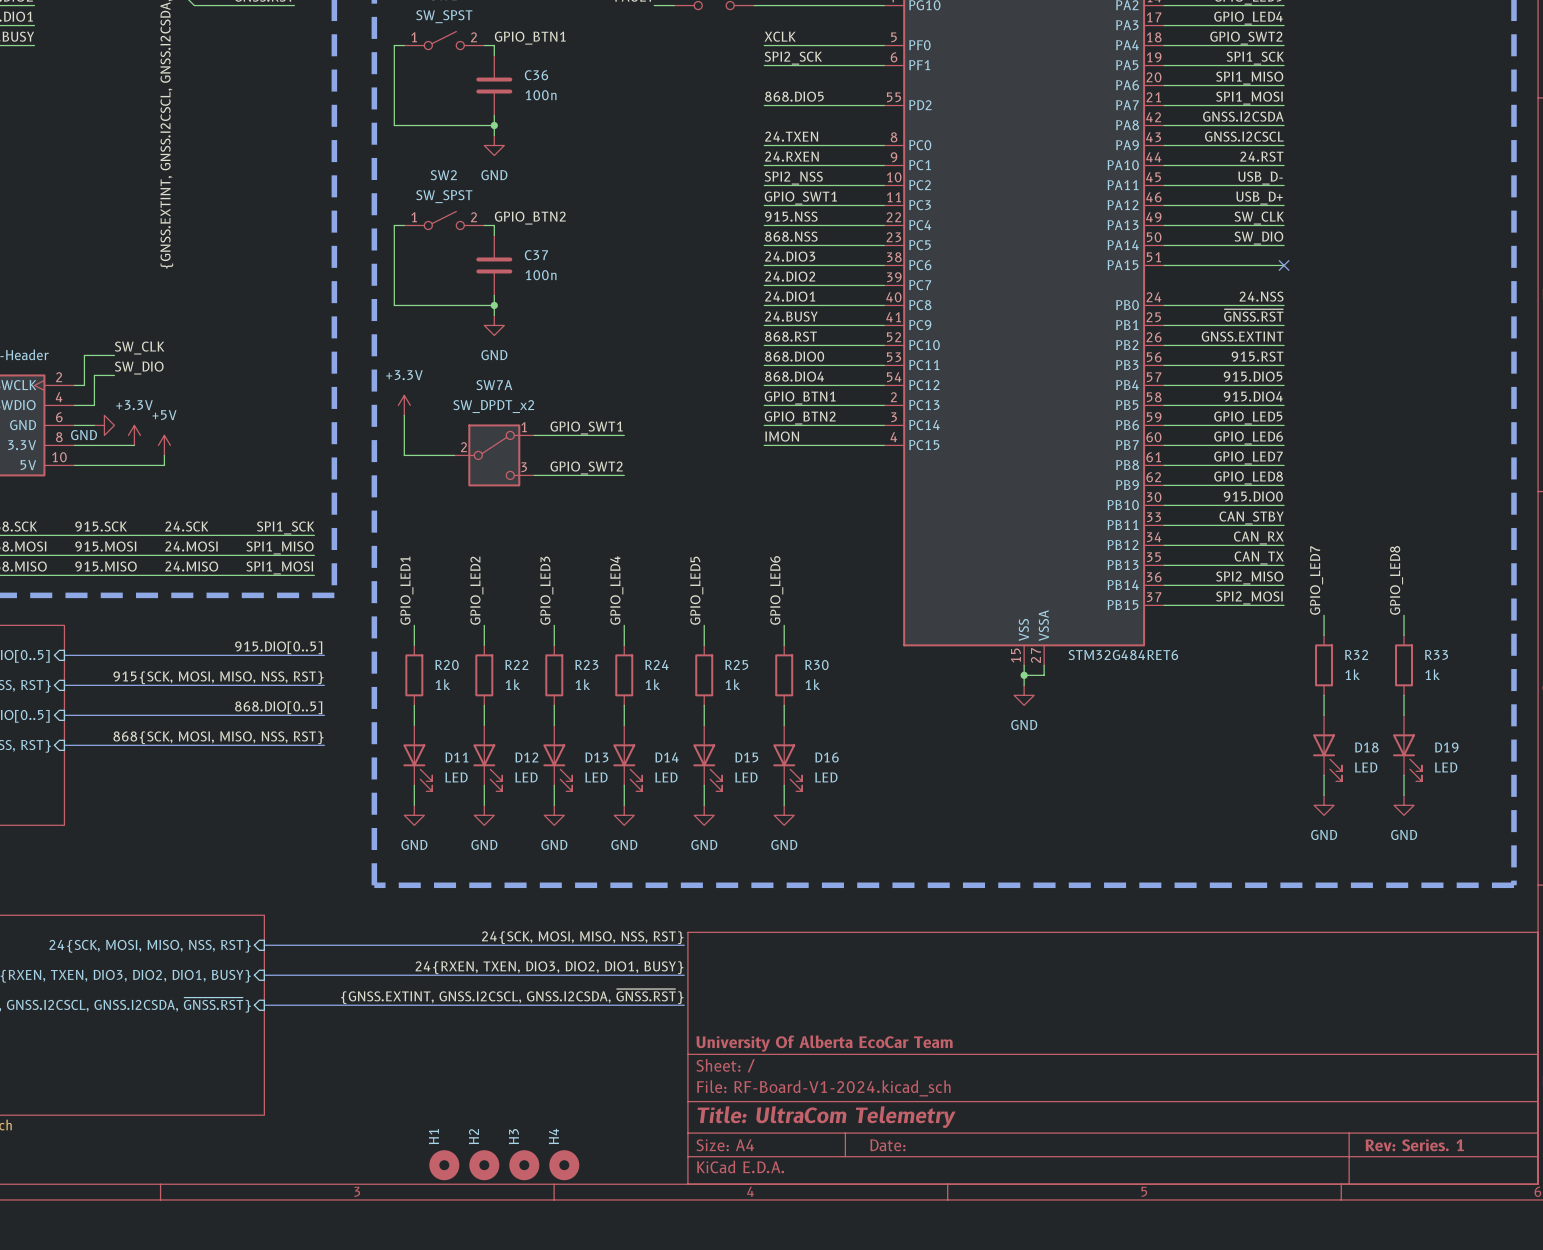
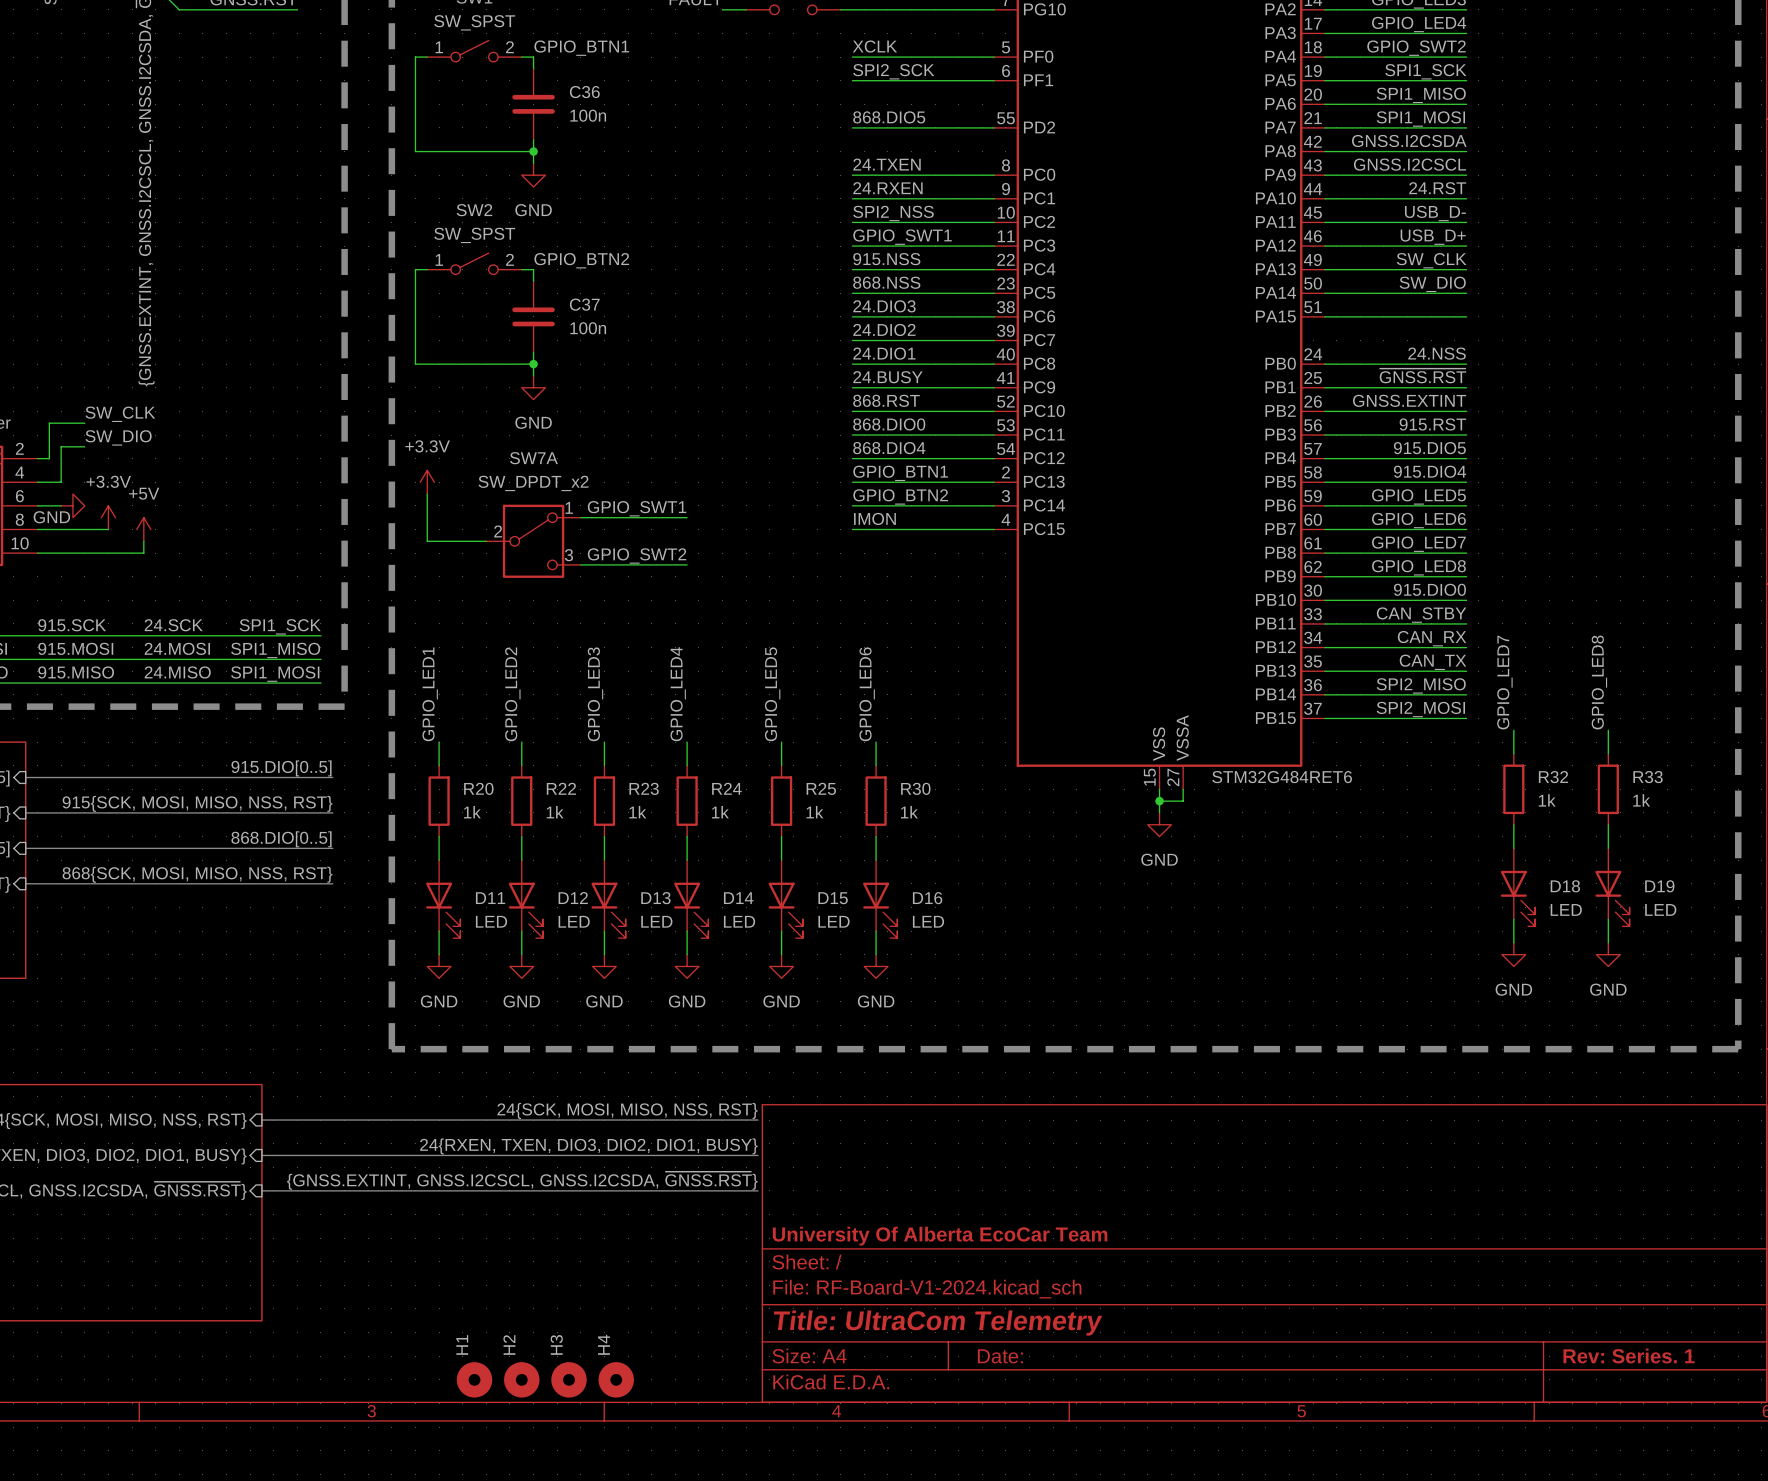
no-connect mark: (1284, 265) -> none

